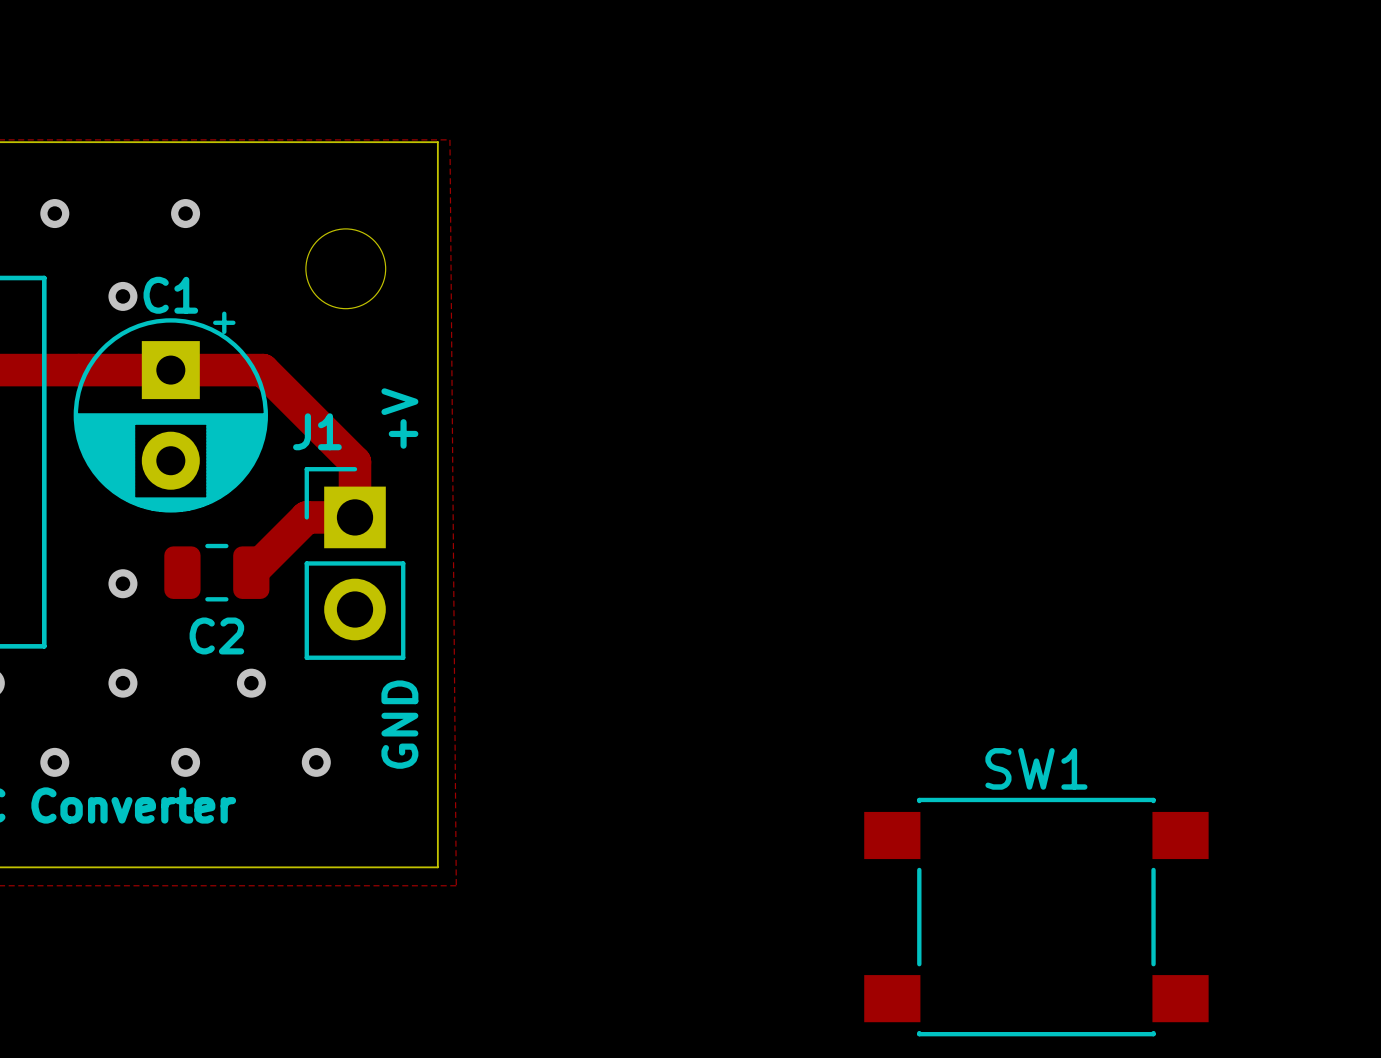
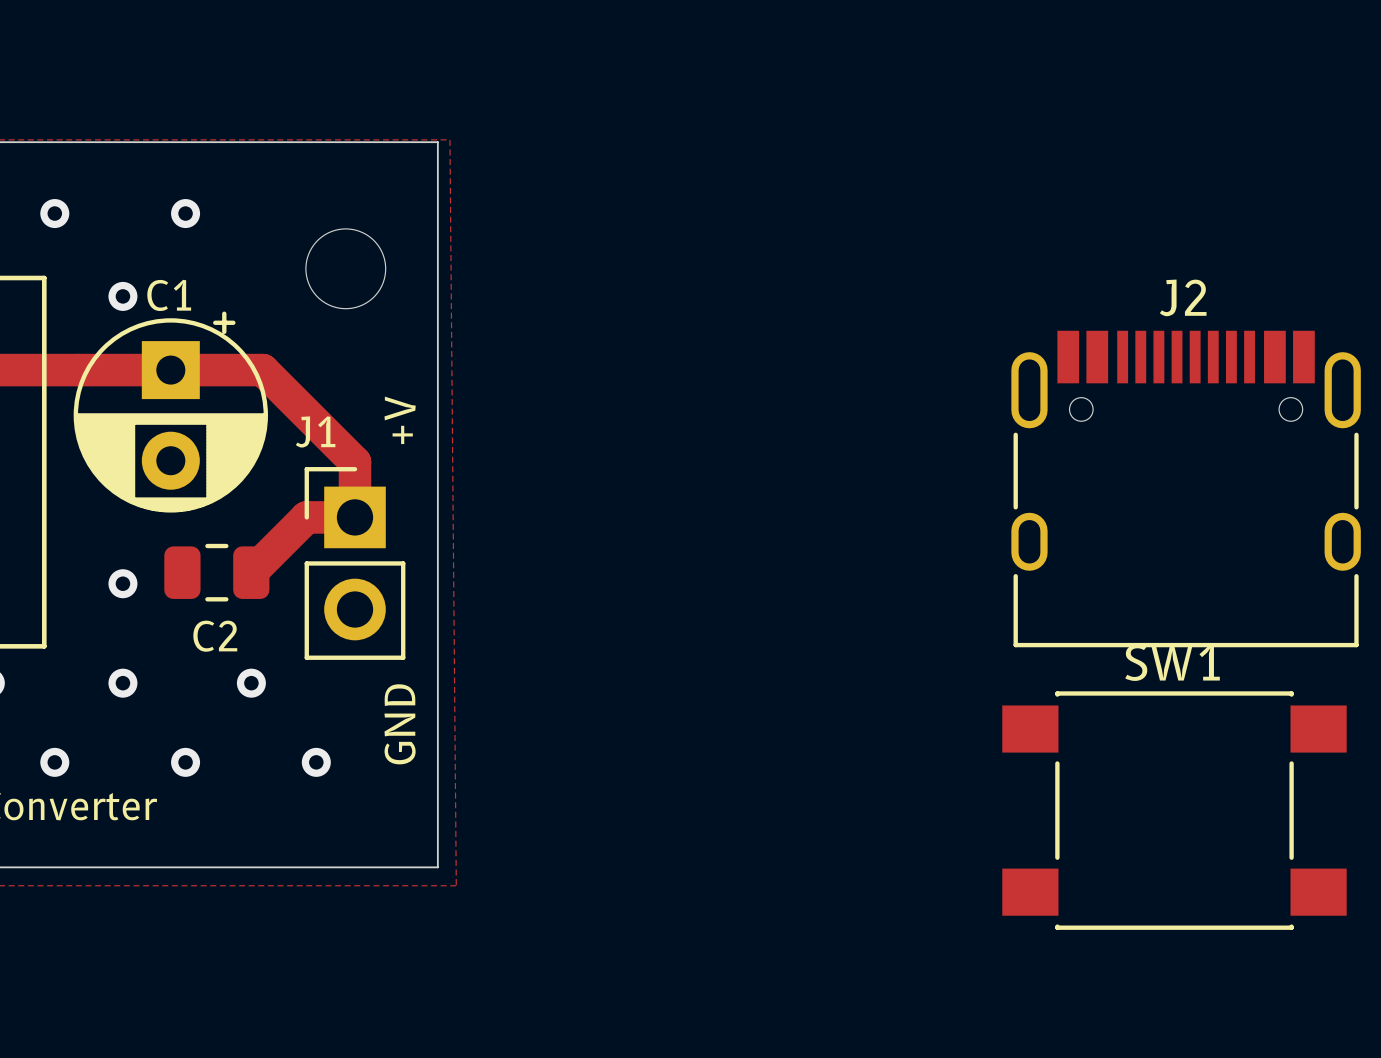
J2: none -> (1186, 489)
SW1 position: (1036, 917) -> (1174, 810)

